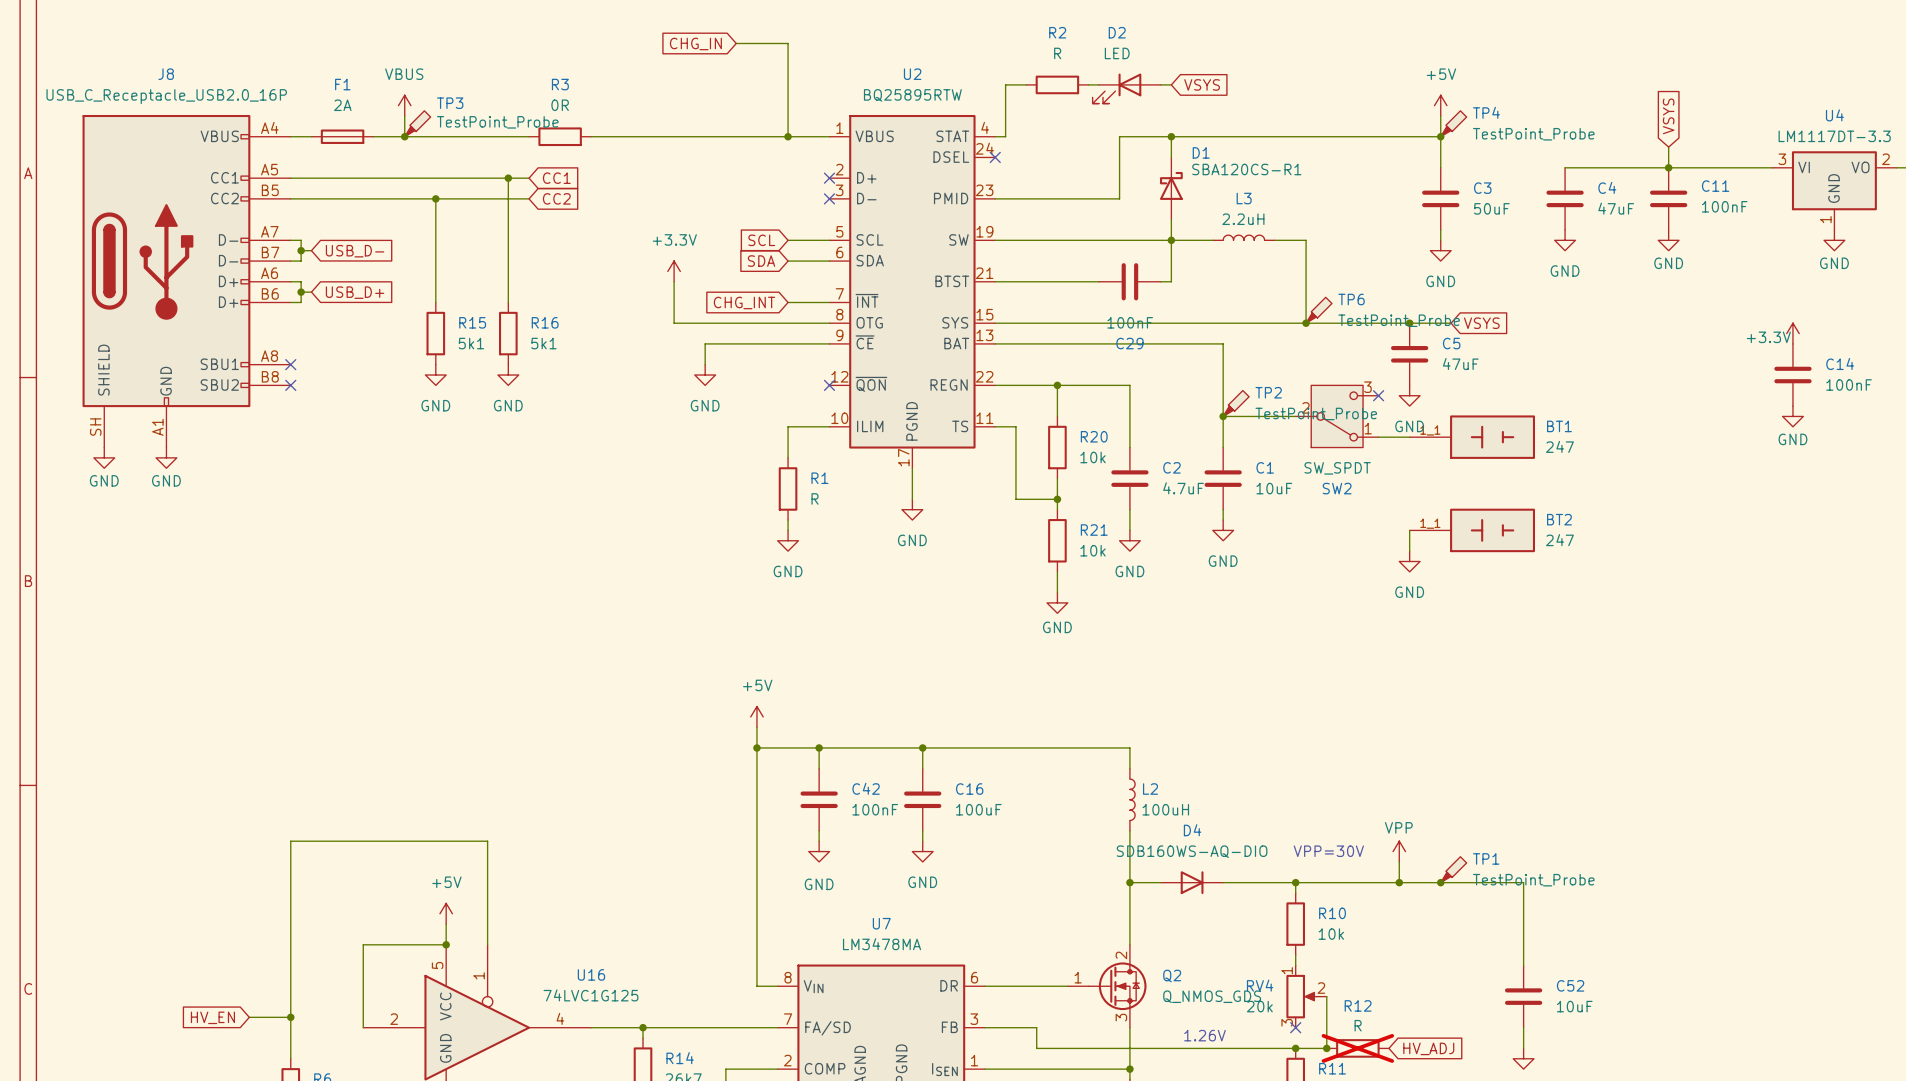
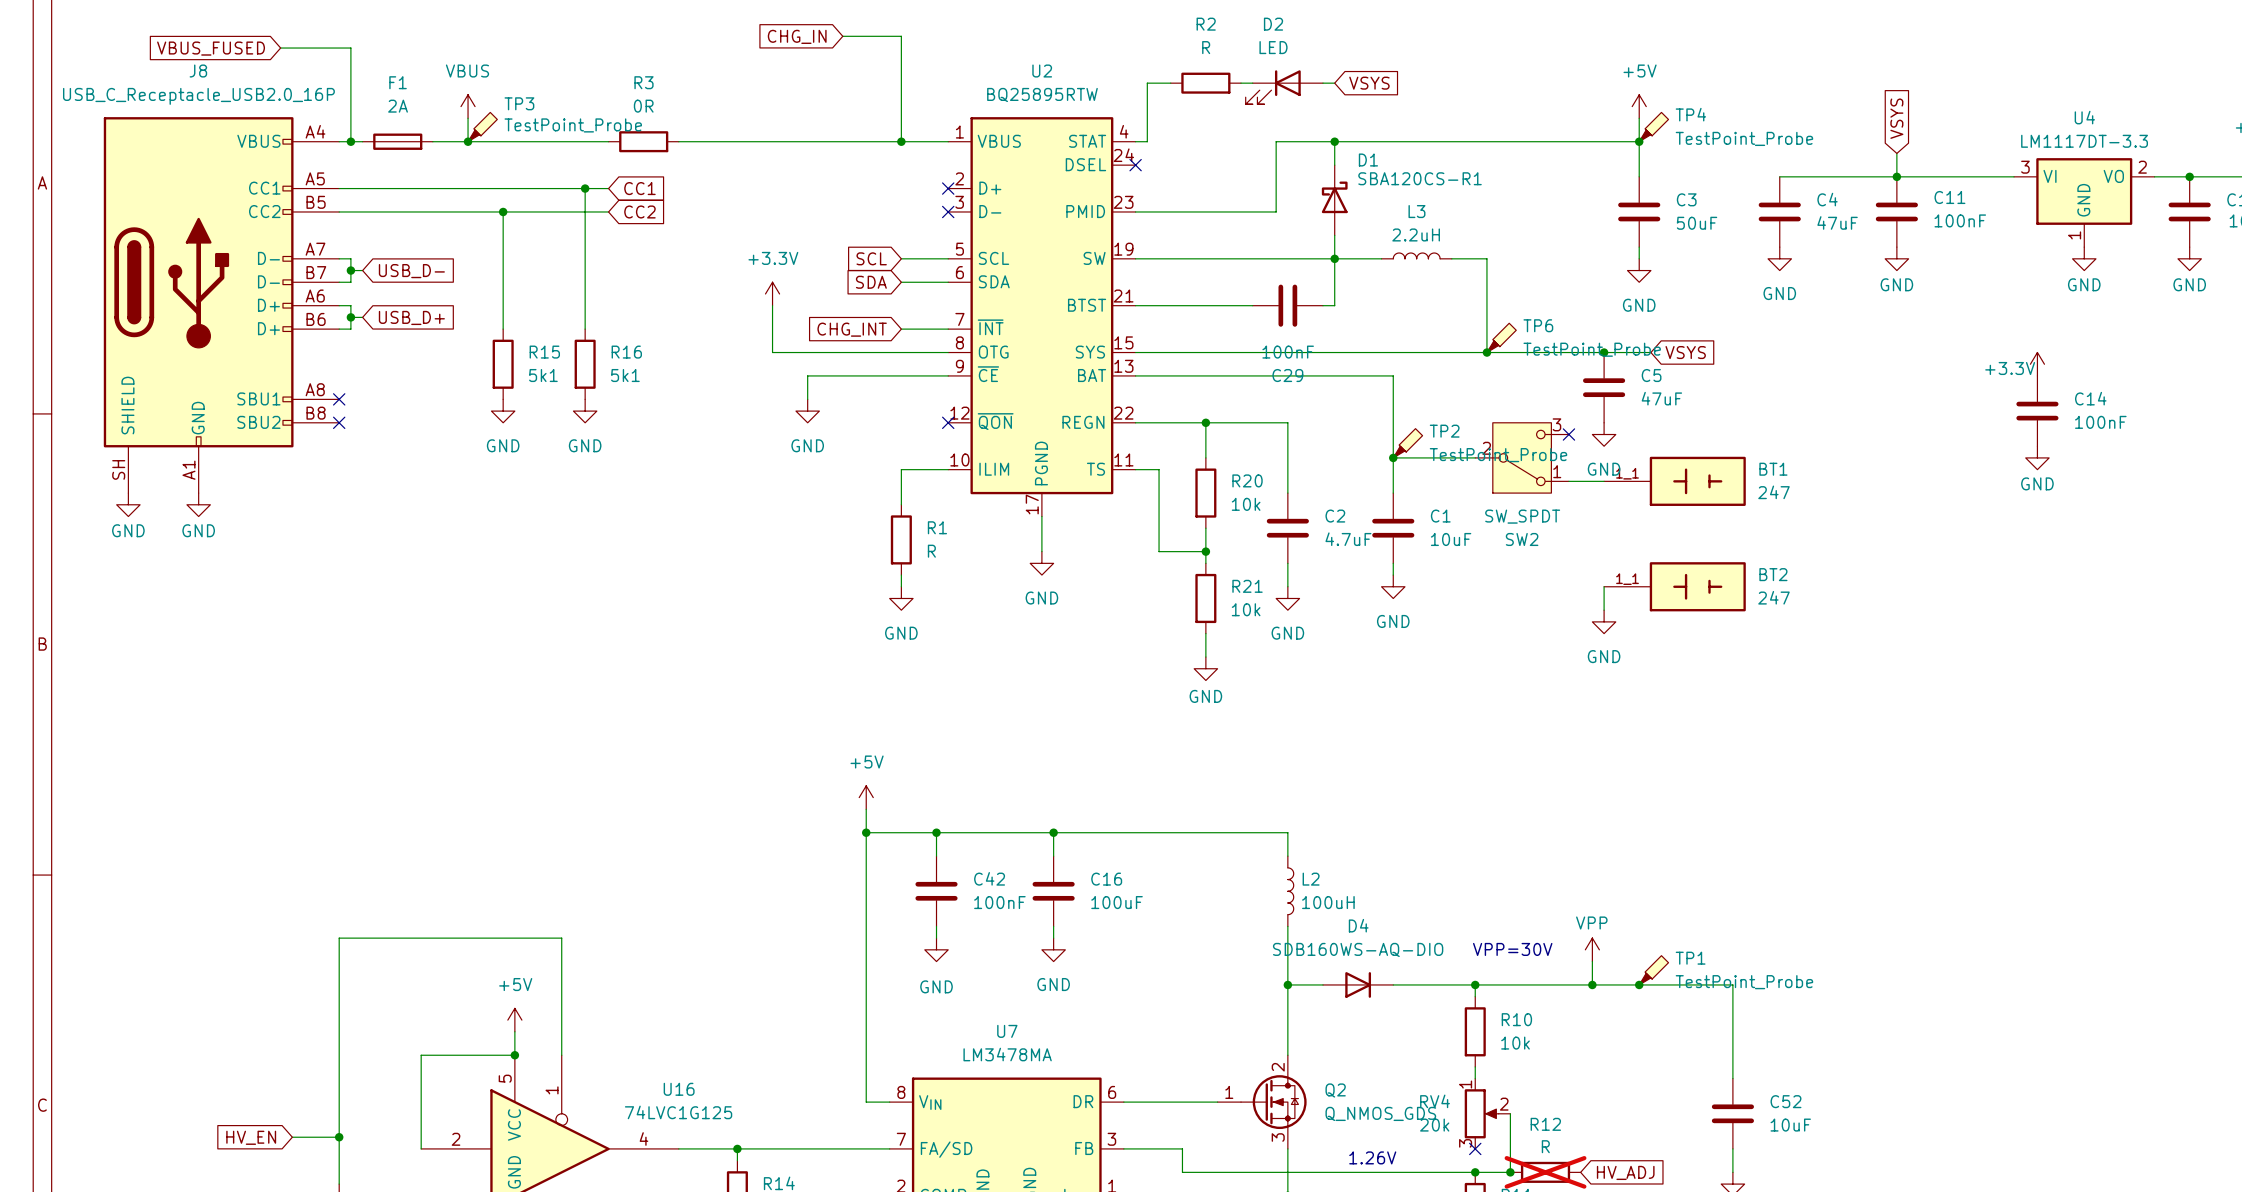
wire: none -> (280, 48) (350, 48) (350, 141)
global label: none -> VBUS_FUSED (211, 48)
junction: none -> (350, 141)

